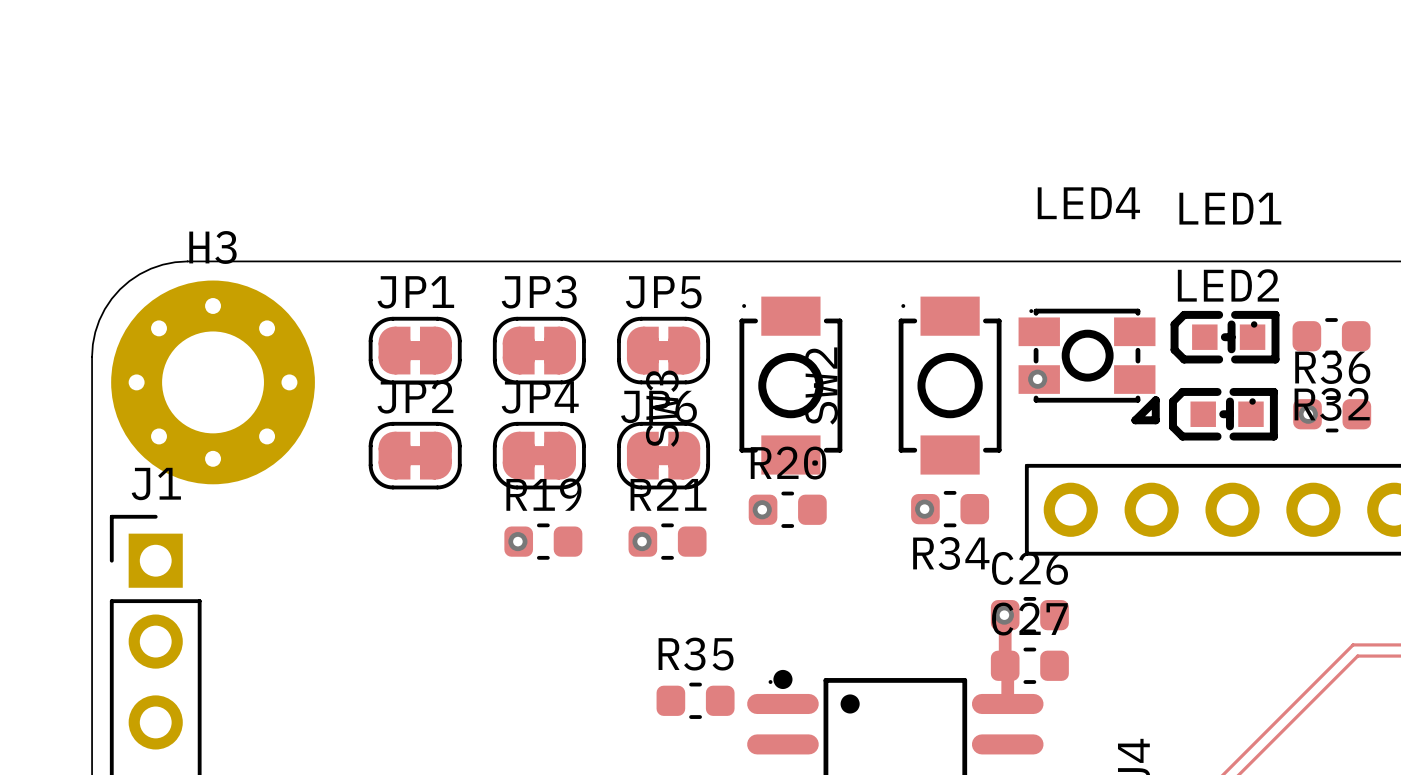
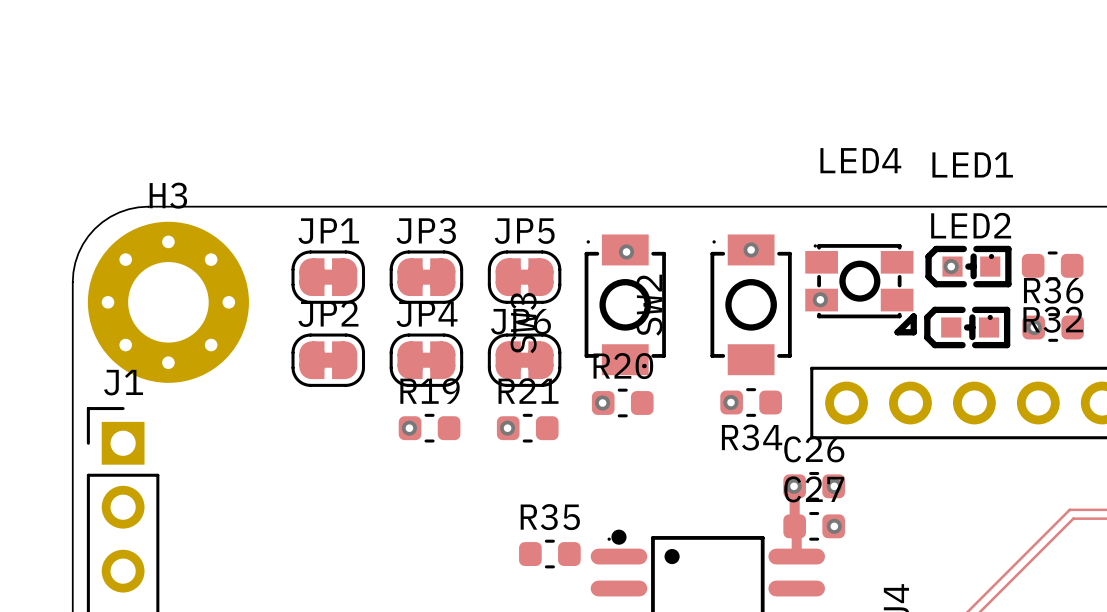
via: none -> (751, 249)
via: none -> (626, 251)
via: none -> (951, 266)
via: none -> (834, 486)
via: none -> (834, 526)

